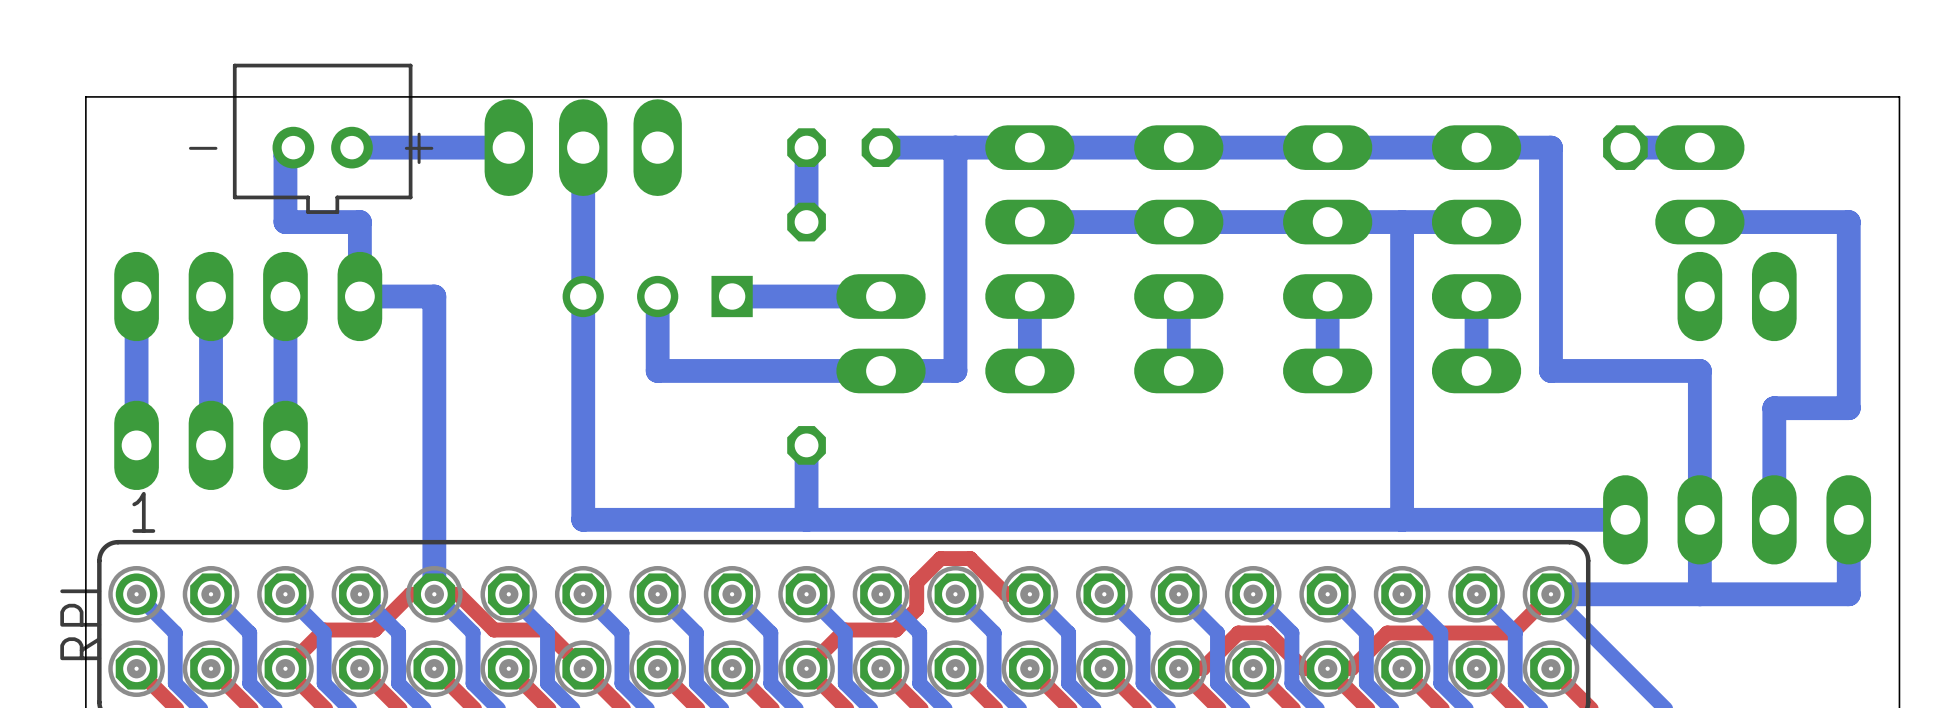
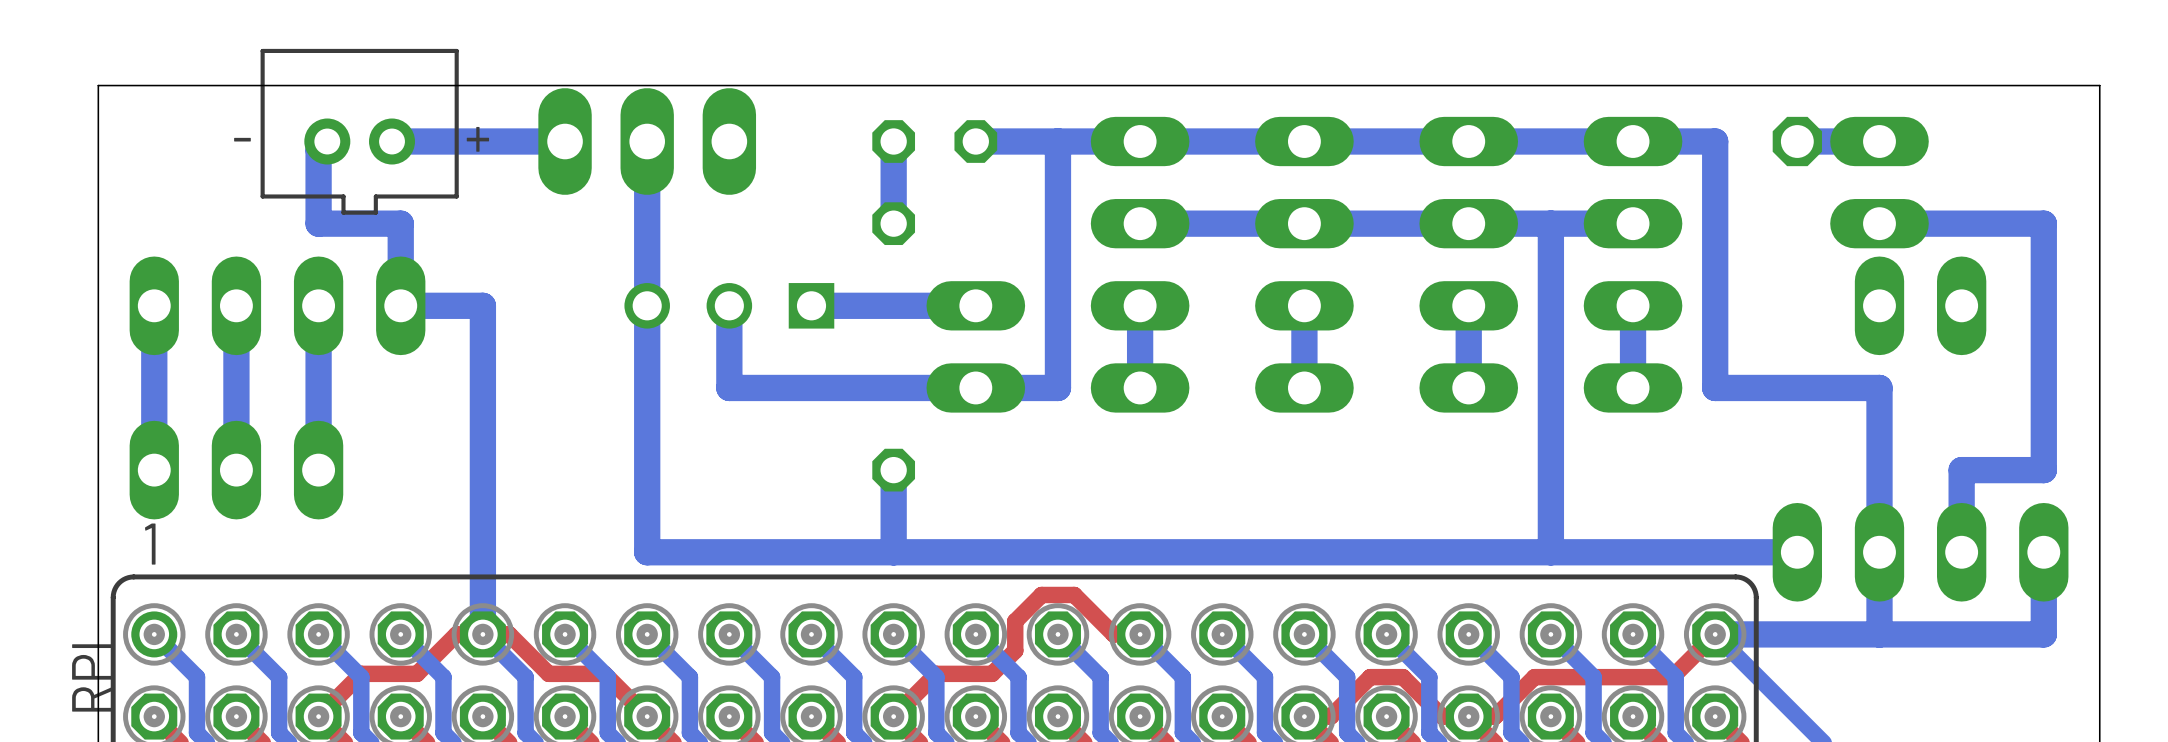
bottom track: (1848, 408) (1774, 408) (1774, 445) -> (2043, 429) (2043, 470) (1961, 470)

